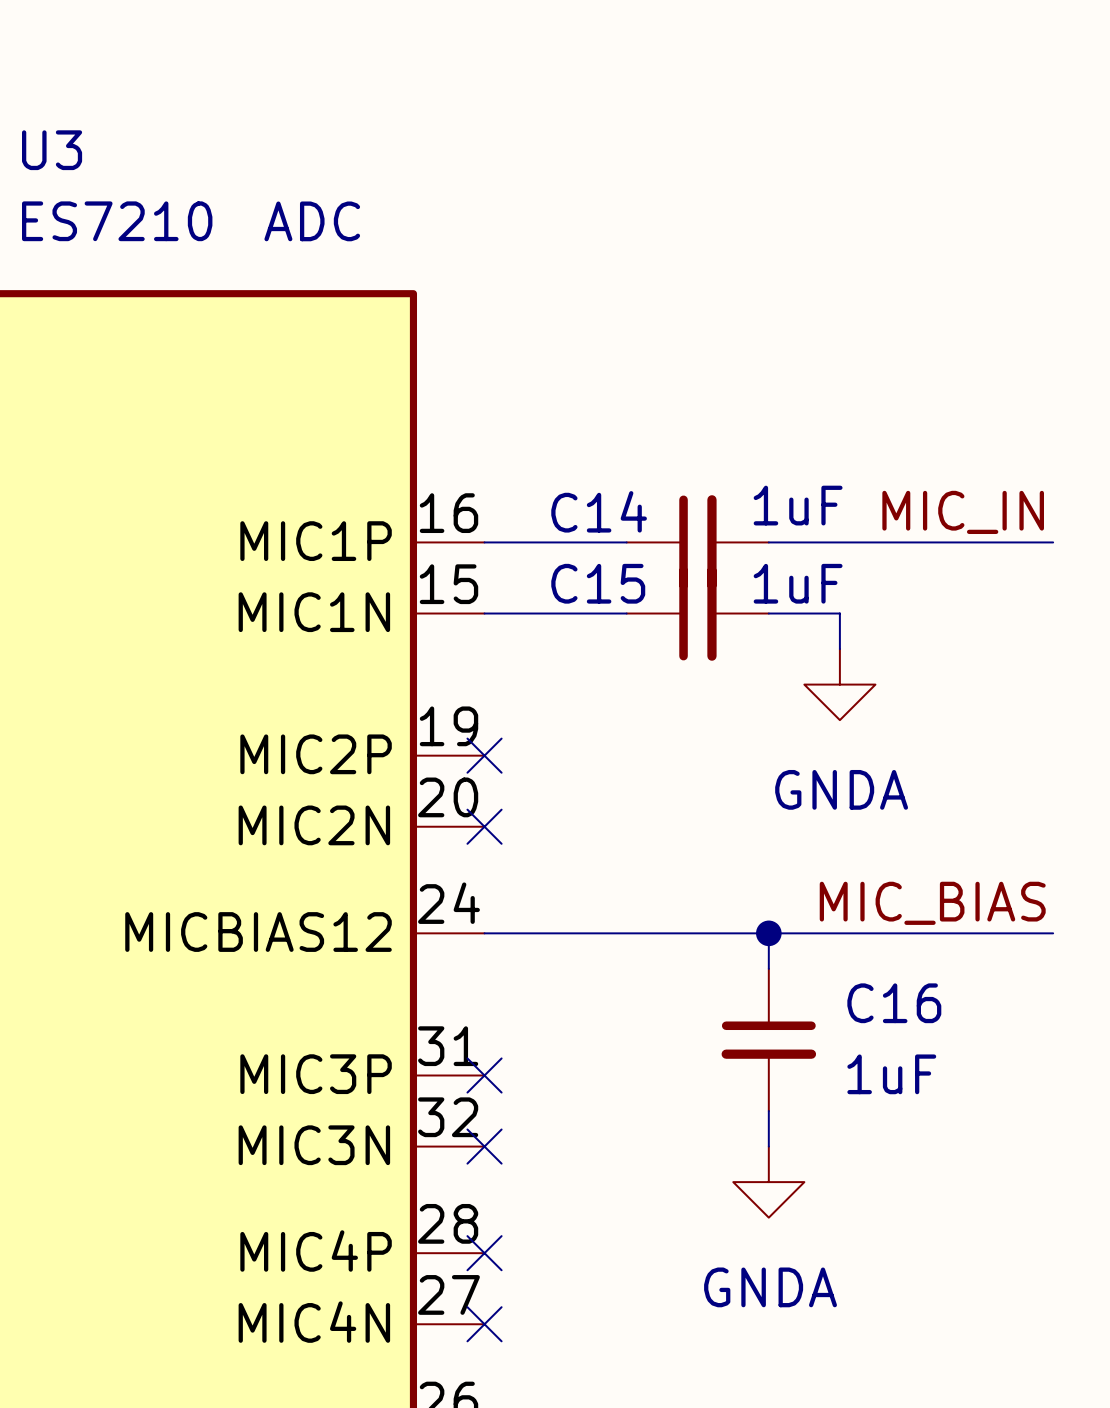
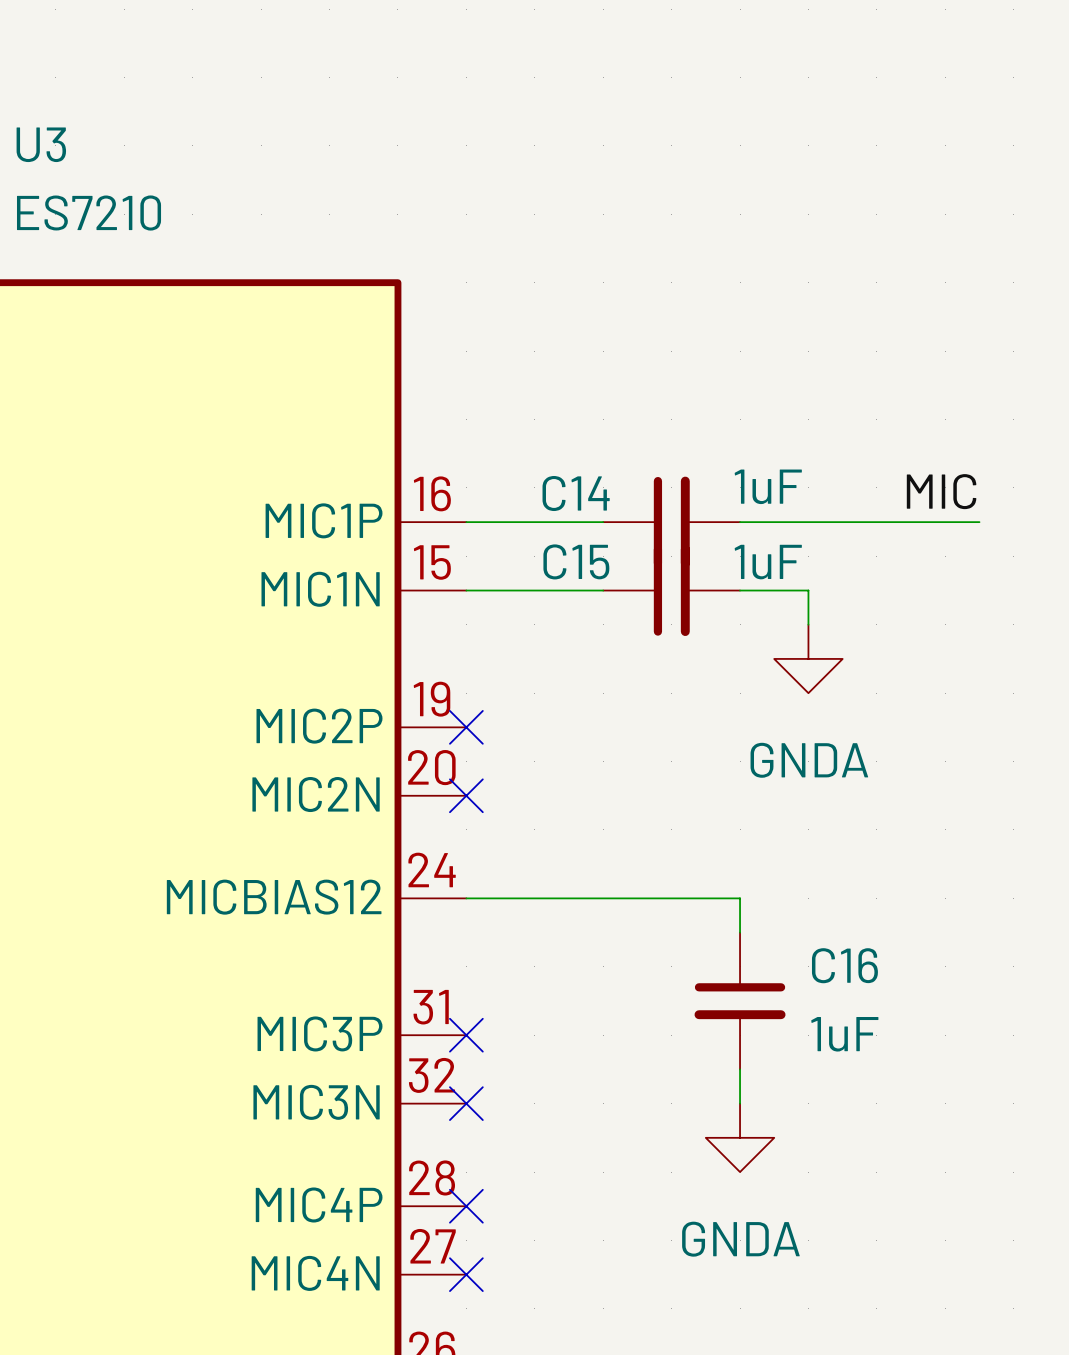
text: ADC (312, 221) -> none
label: MIC_IN (963, 512) -> MIC (941, 491)
wire: (1017, 542) (1053, 542) -> none
label: MIC_BIAS (932, 903) -> none
wire: (768, 933) (1053, 933) -> none
junction: (768, 933) -> none

